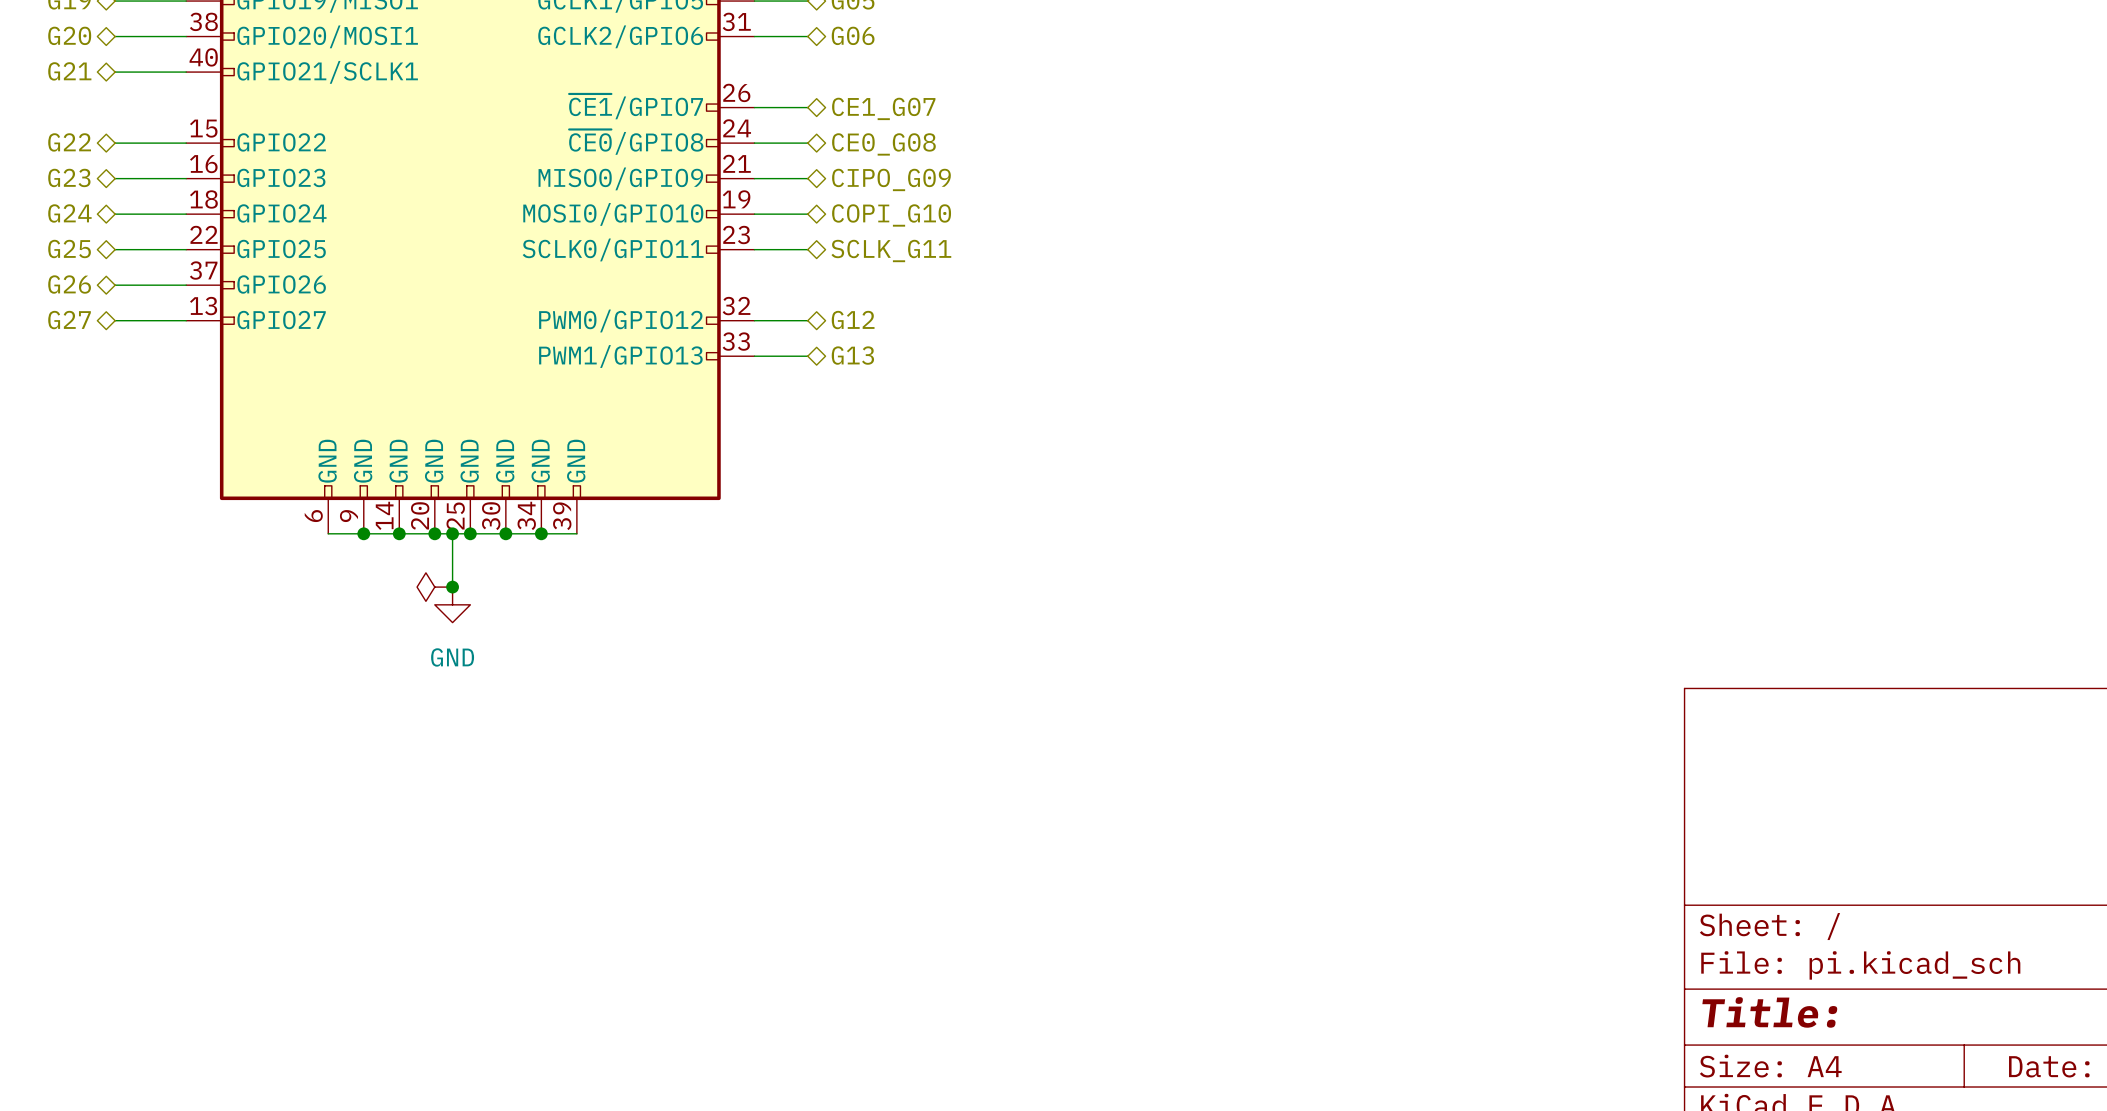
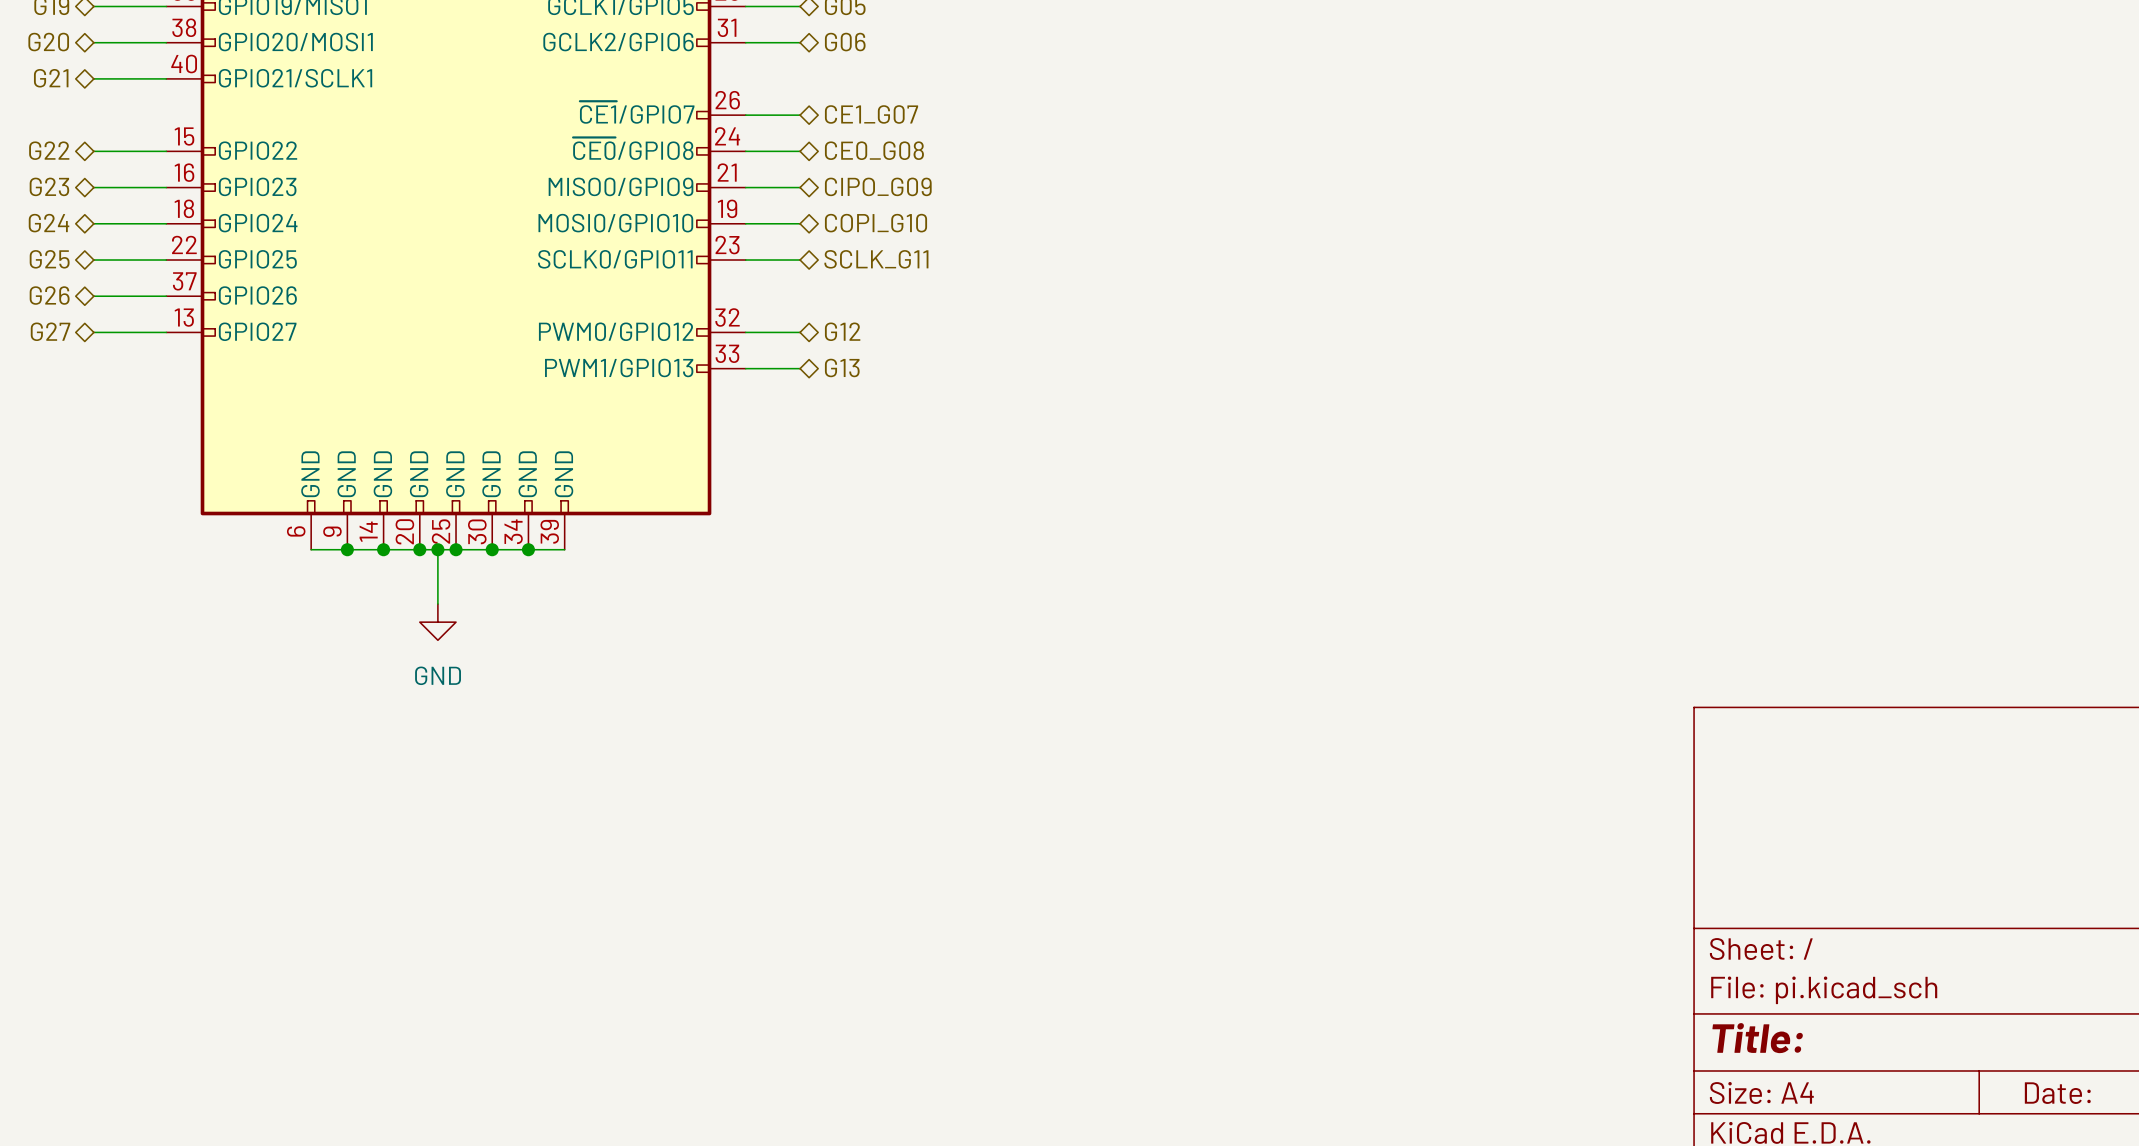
power symbol: (434, 587) -> none
junction: (452, 587) -> none

